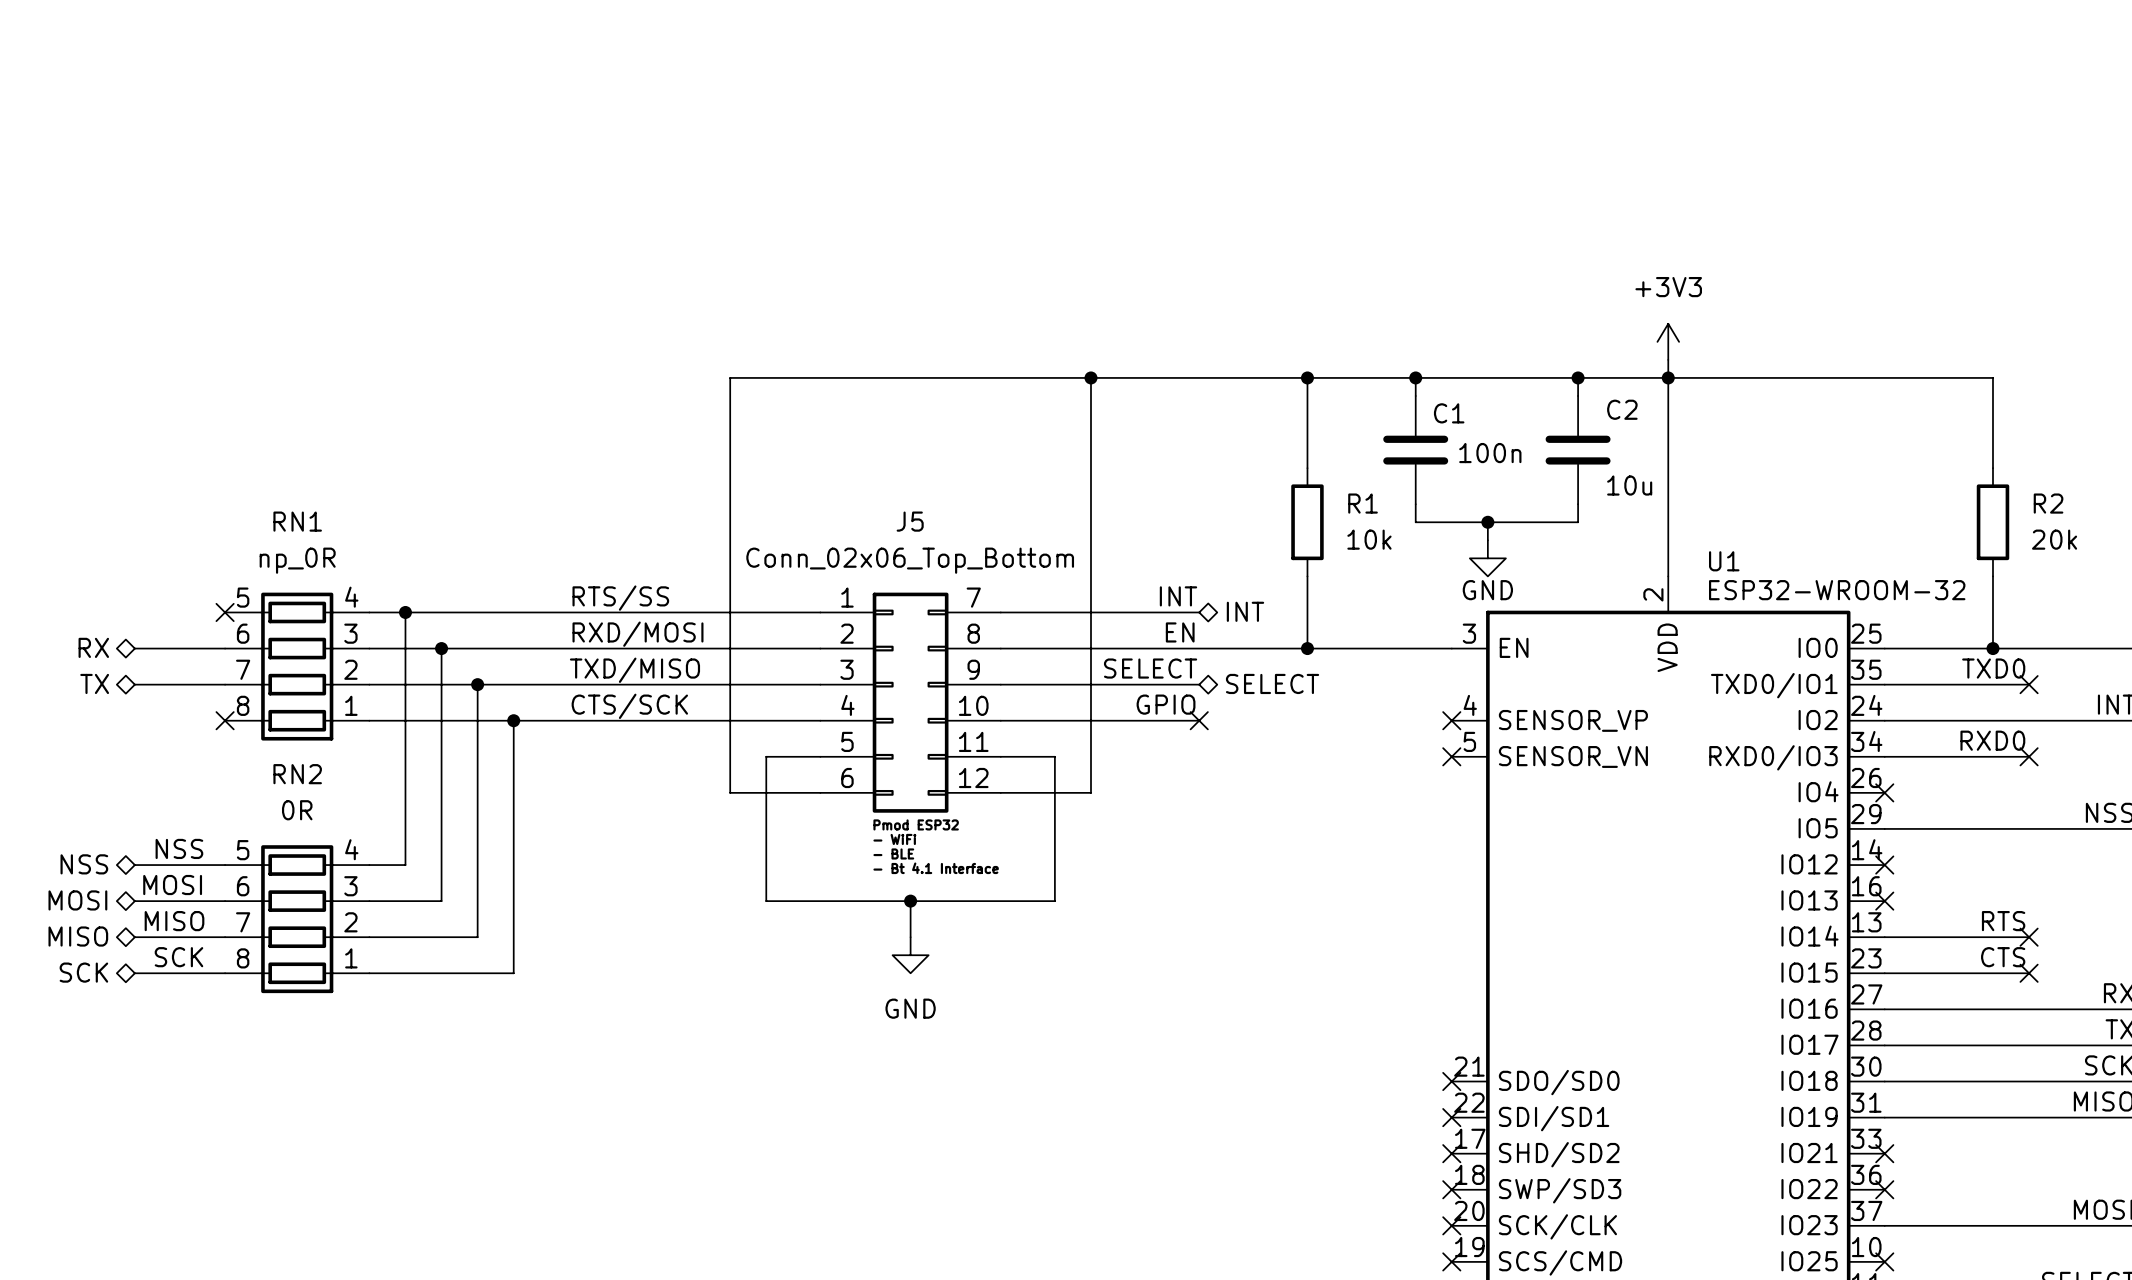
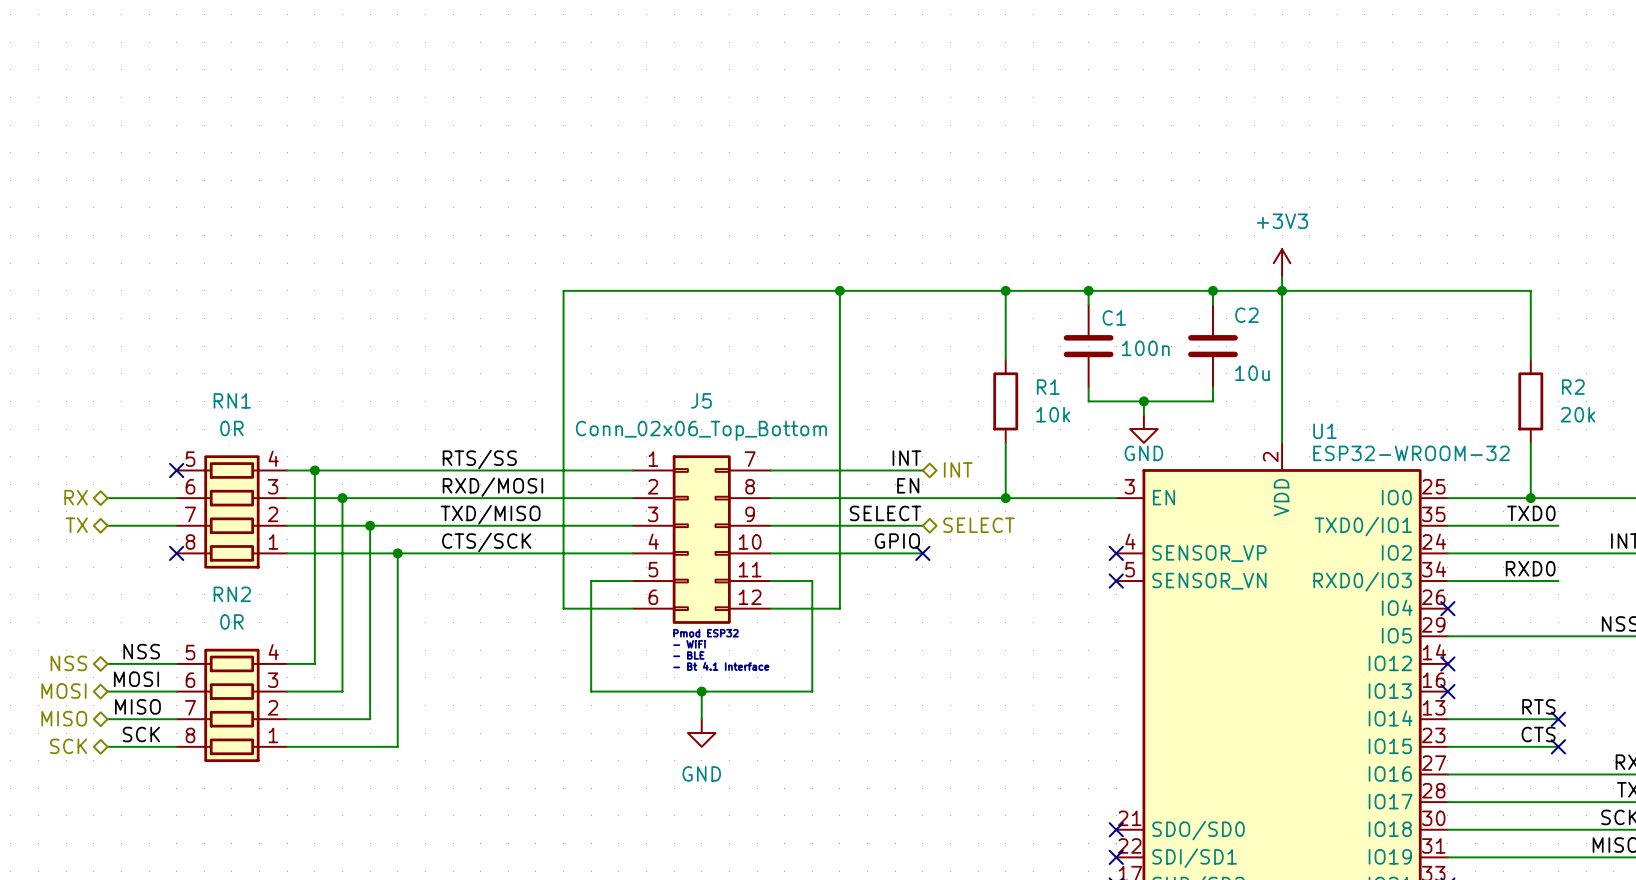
RN1 value: np_0R (297, 560) -> 0R (231, 428)
no-connect mark: (2029, 684) -> none
no-connect mark: (2029, 756) -> none

